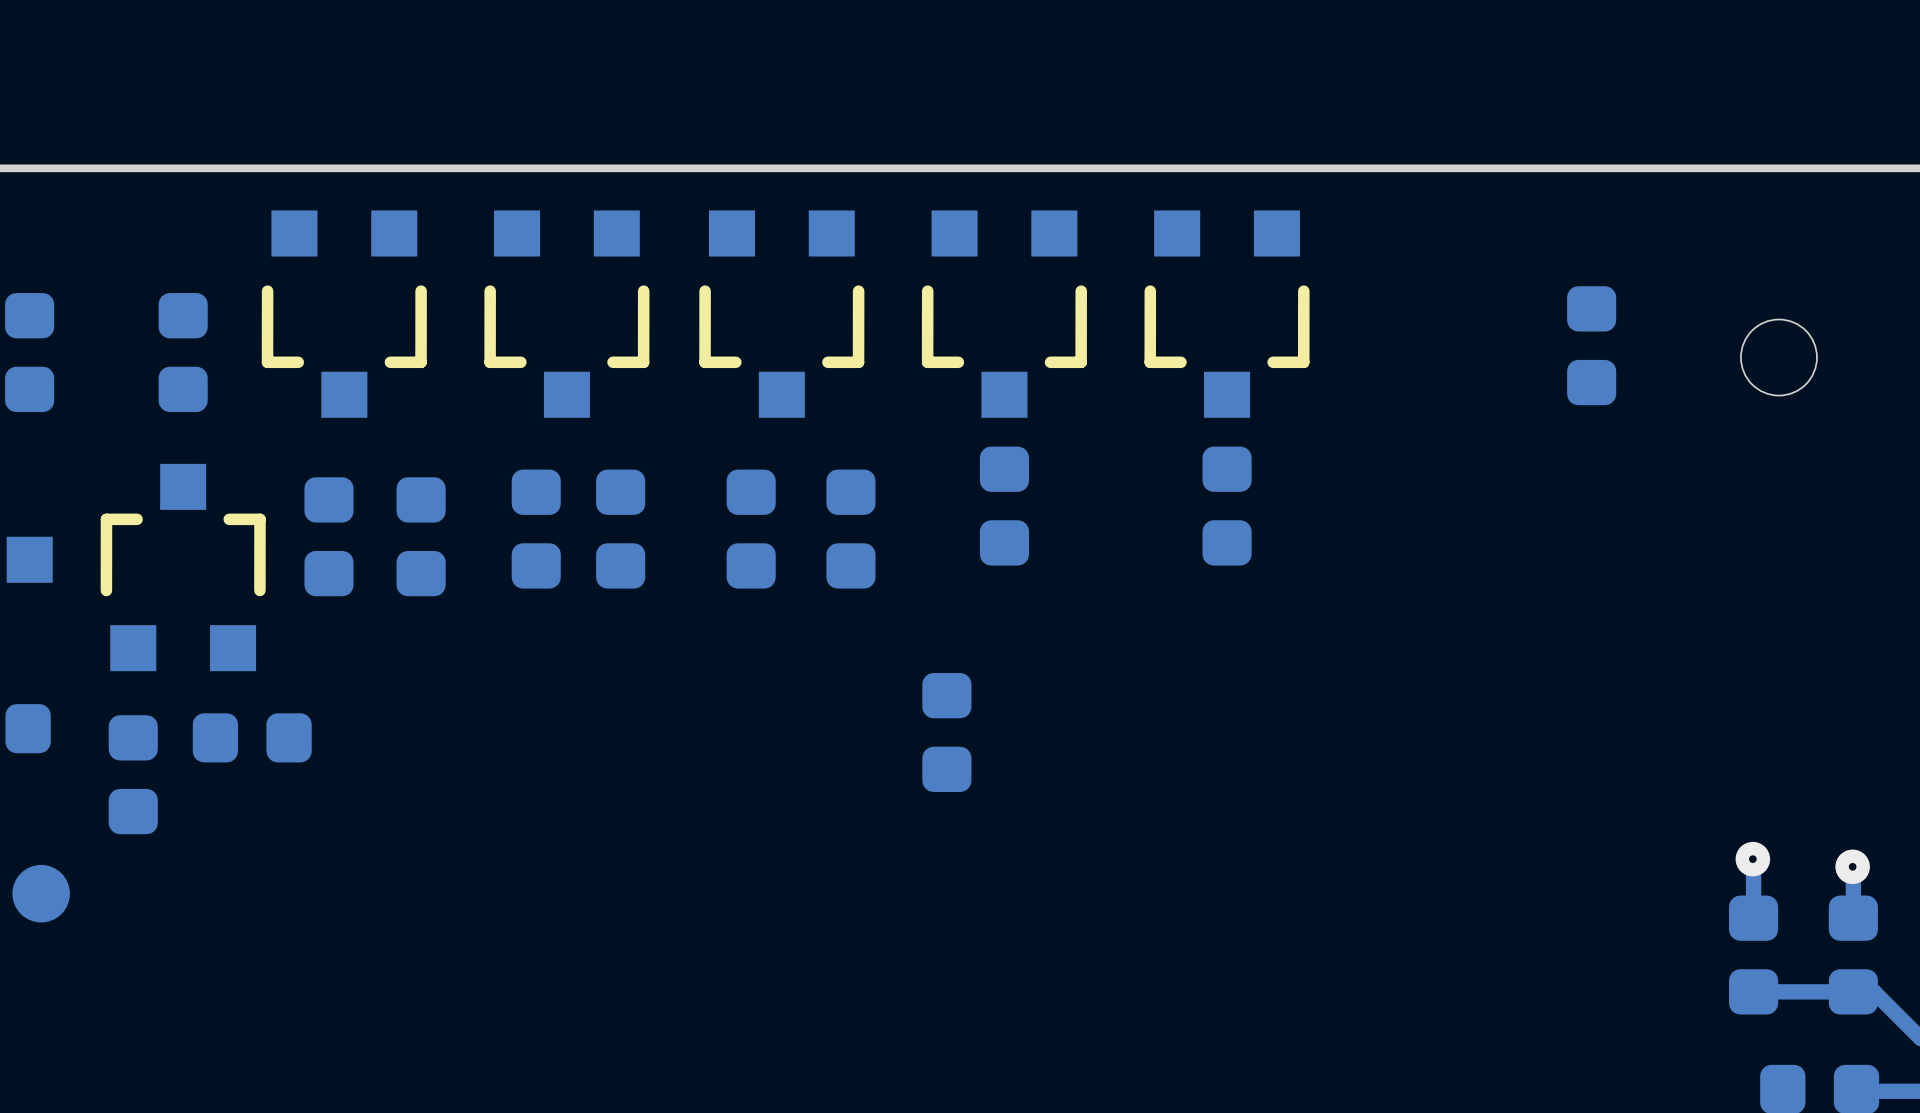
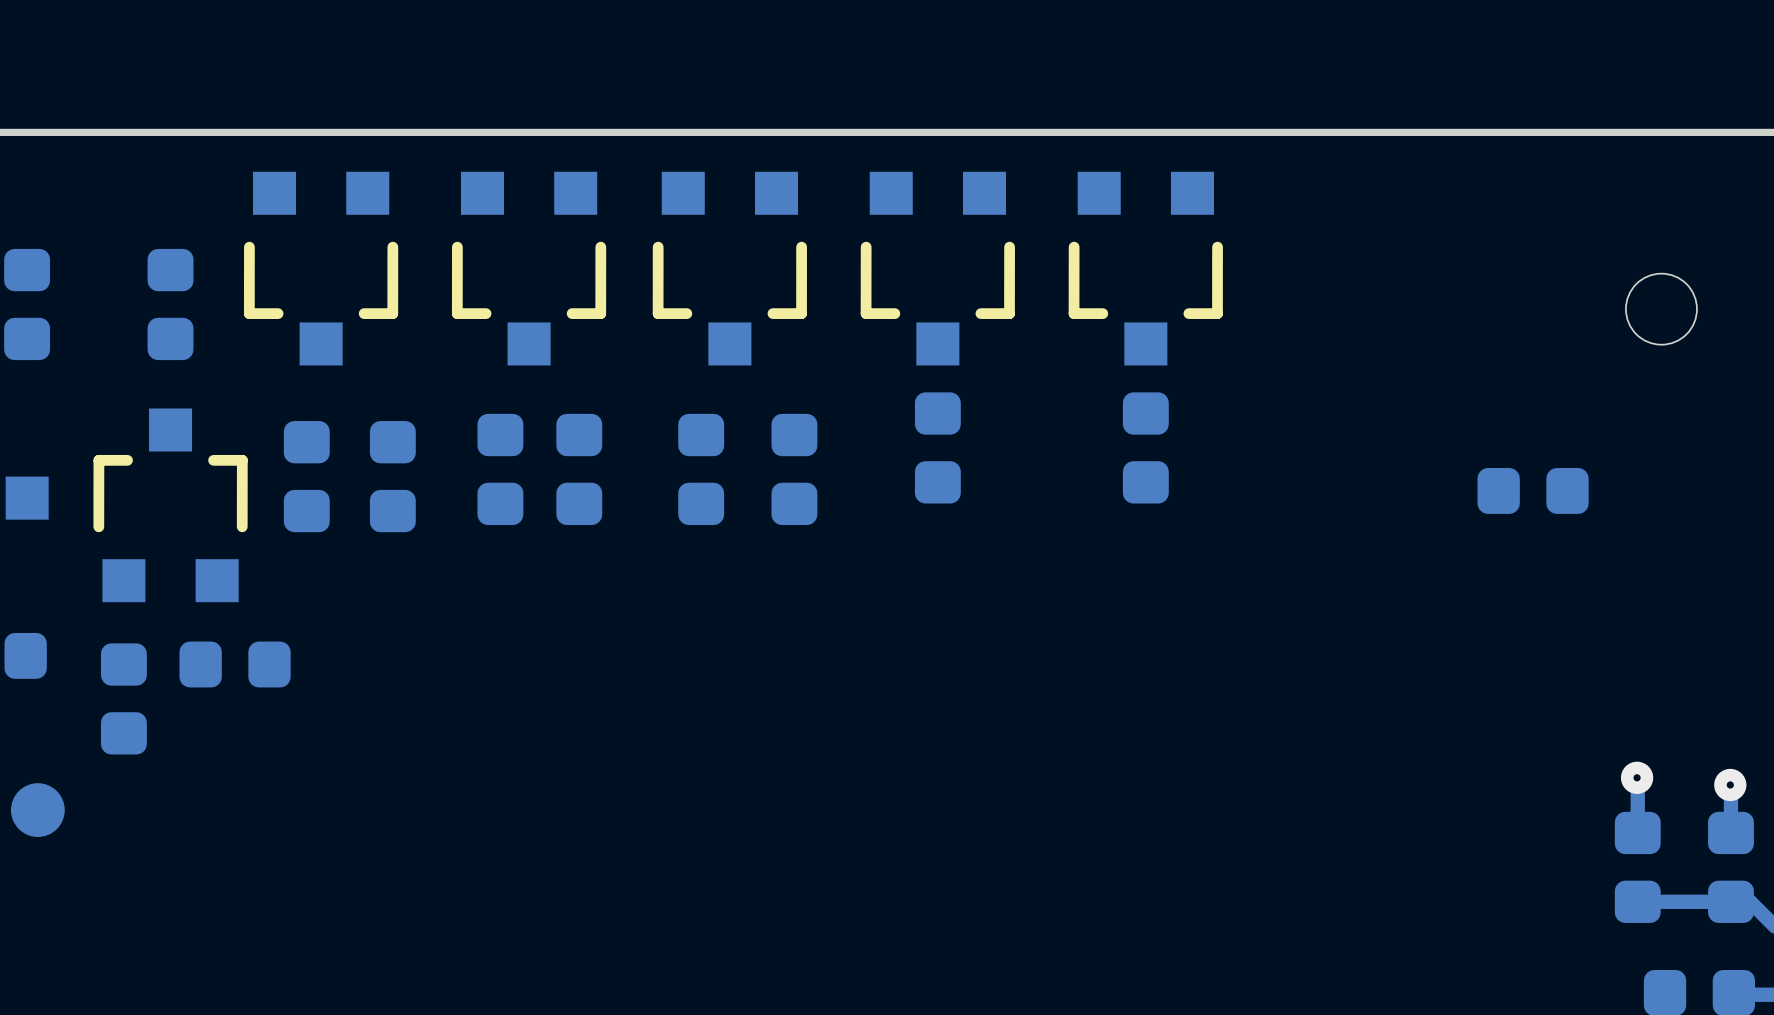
part rotation: 0° (1591, 345) -> 90° clockwise (1533, 490)
part position: (1591, 345) -> (1533, 490)
part: (946, 732) -> none

